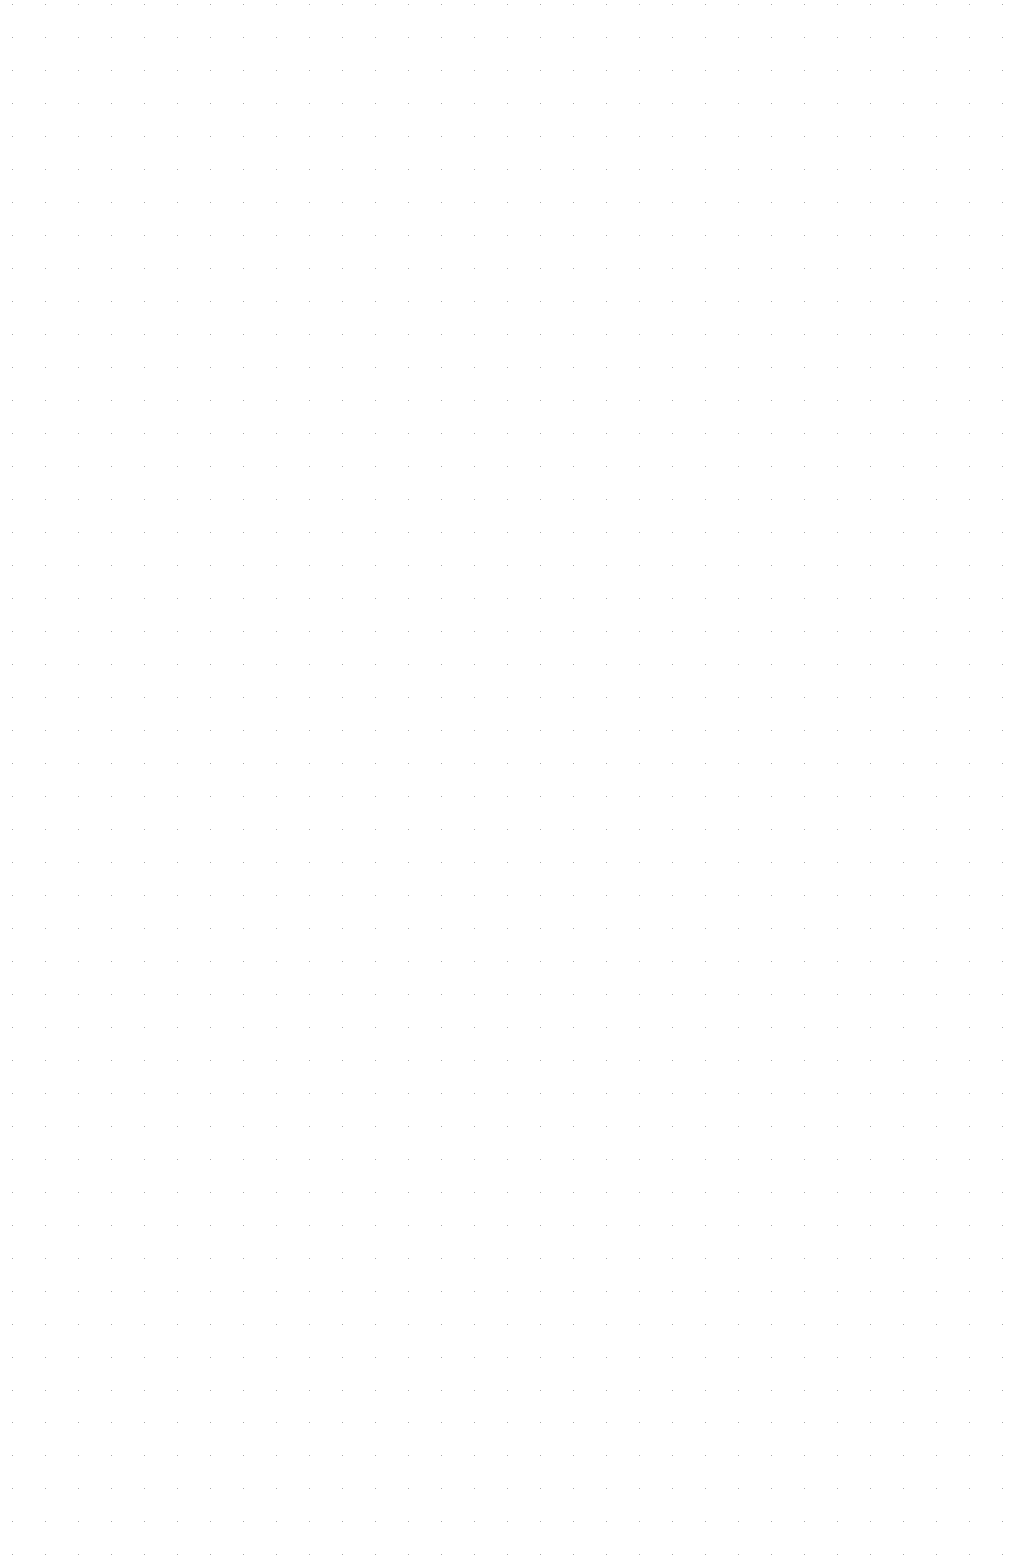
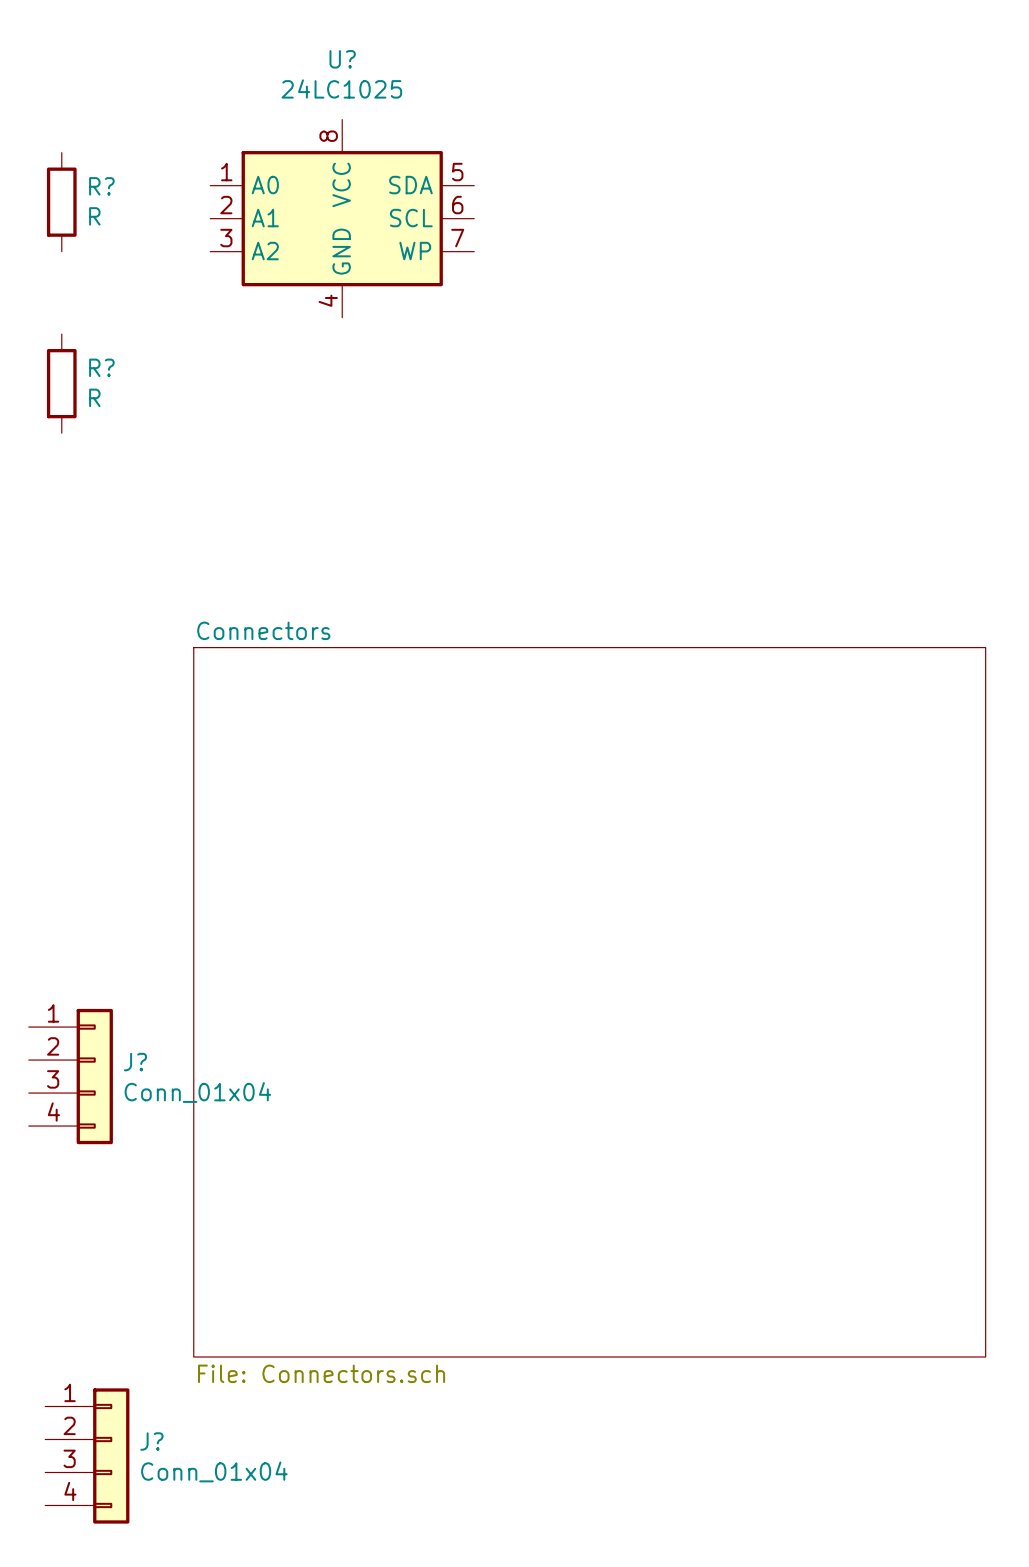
R?: none -> R (61, 202)
U?: none -> 24LC1025 (342, 218)
R?: none -> R (61, 383)
sheet Connectors: none -> File: Connectors.sch (589, 1002)
J?: none -> Conn_01x04 (70, 1076)
J?: none -> Conn_01x04 (87, 1455)

